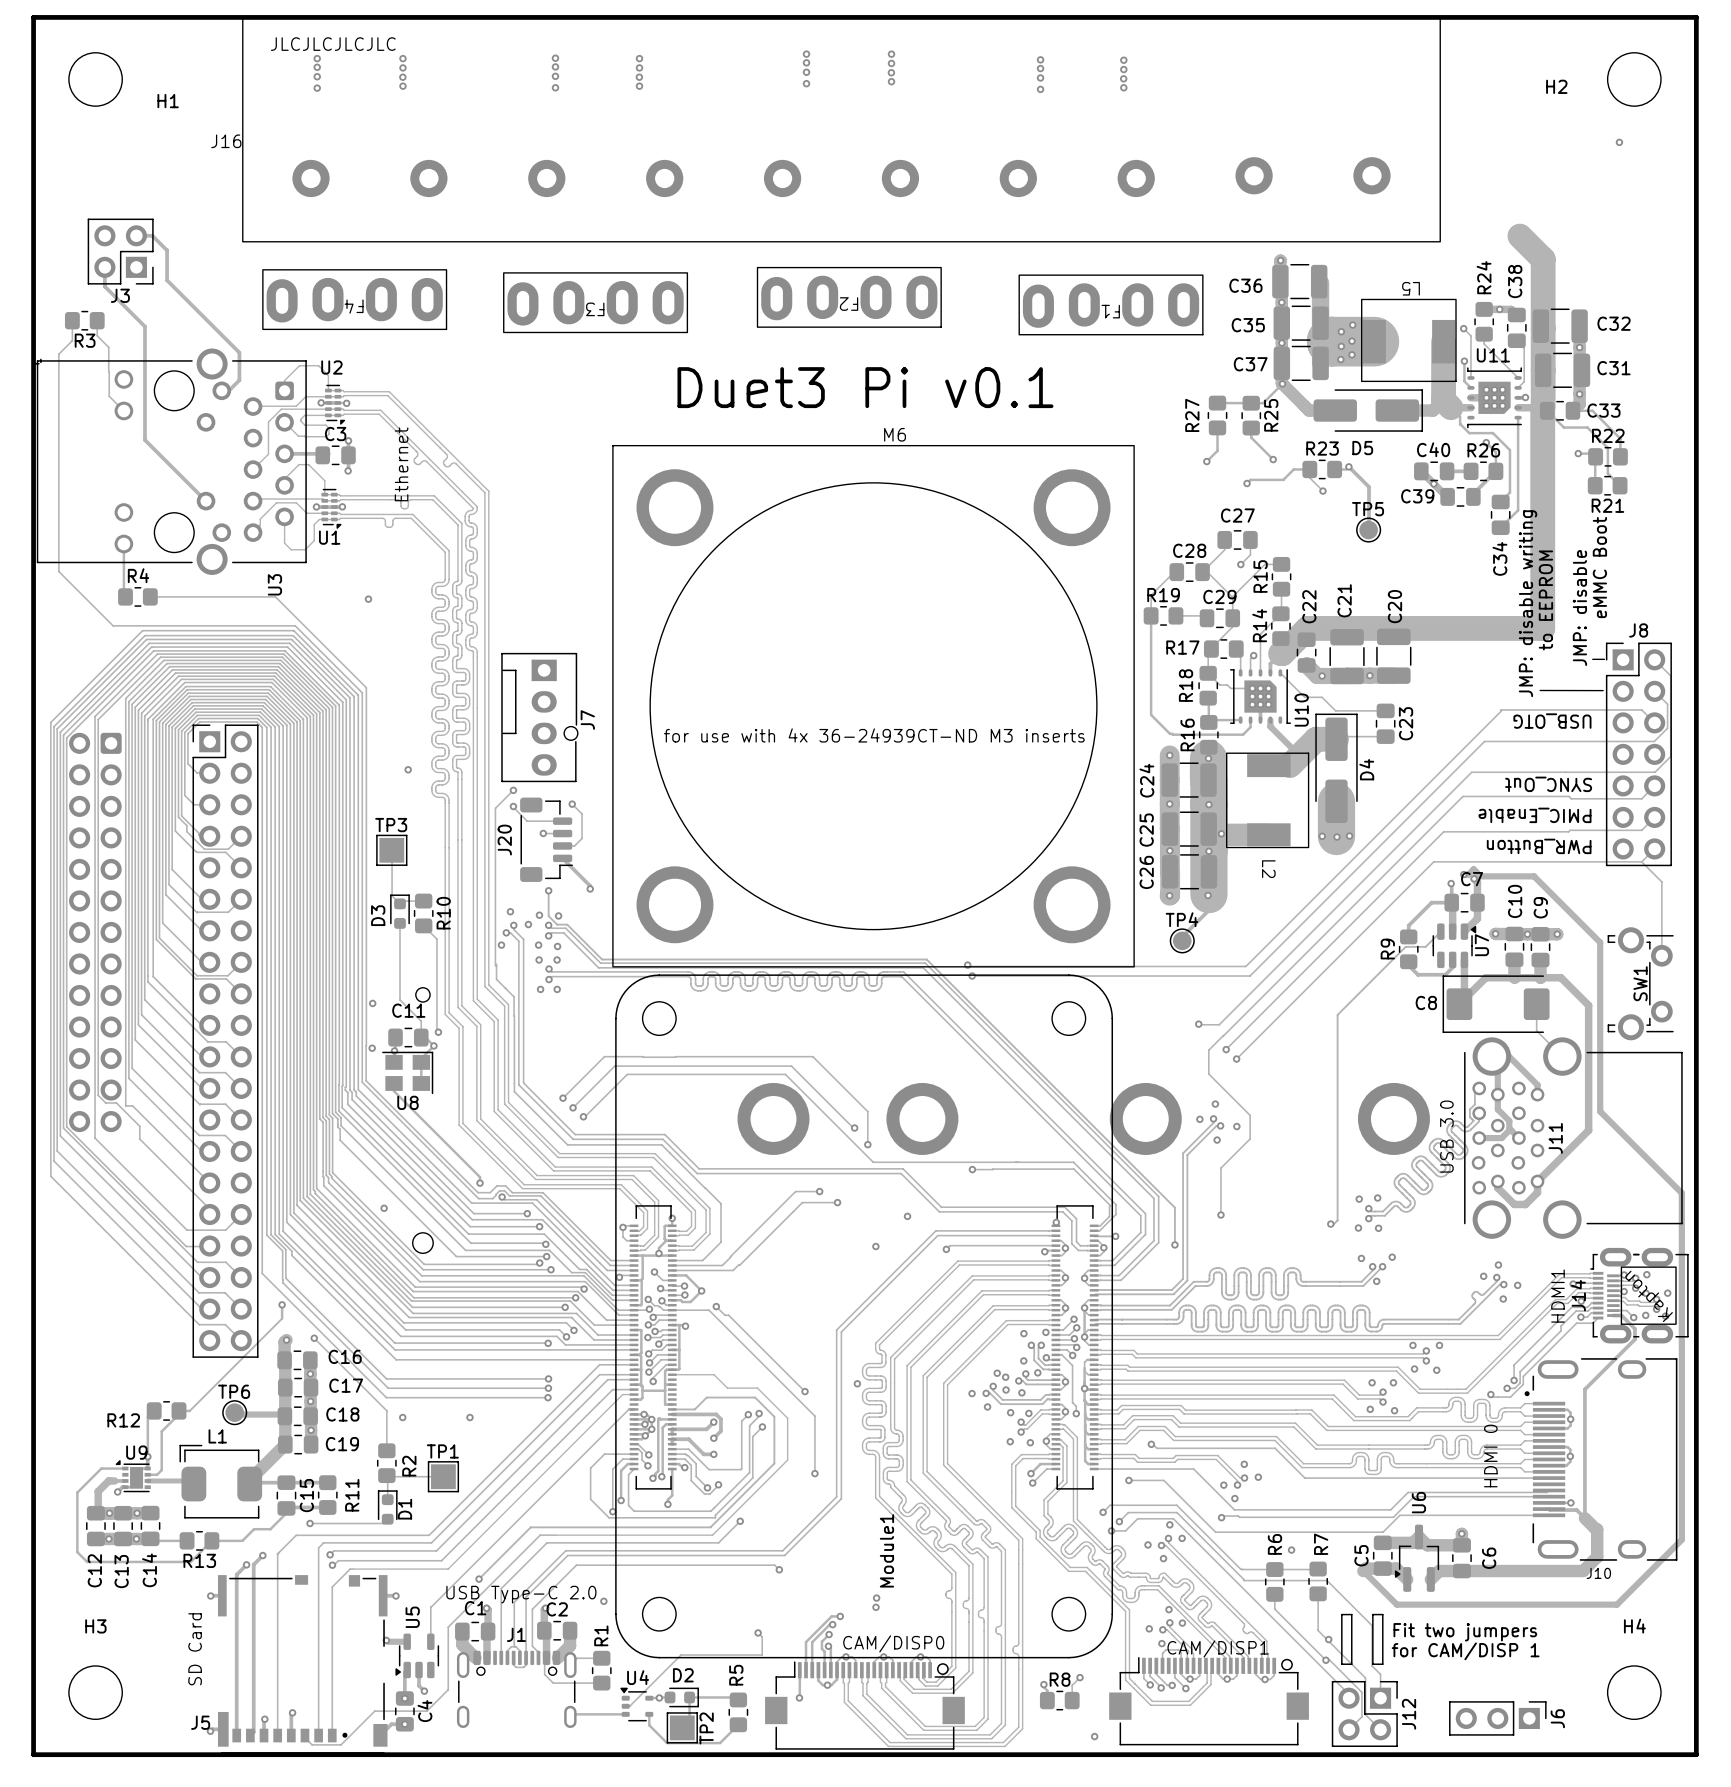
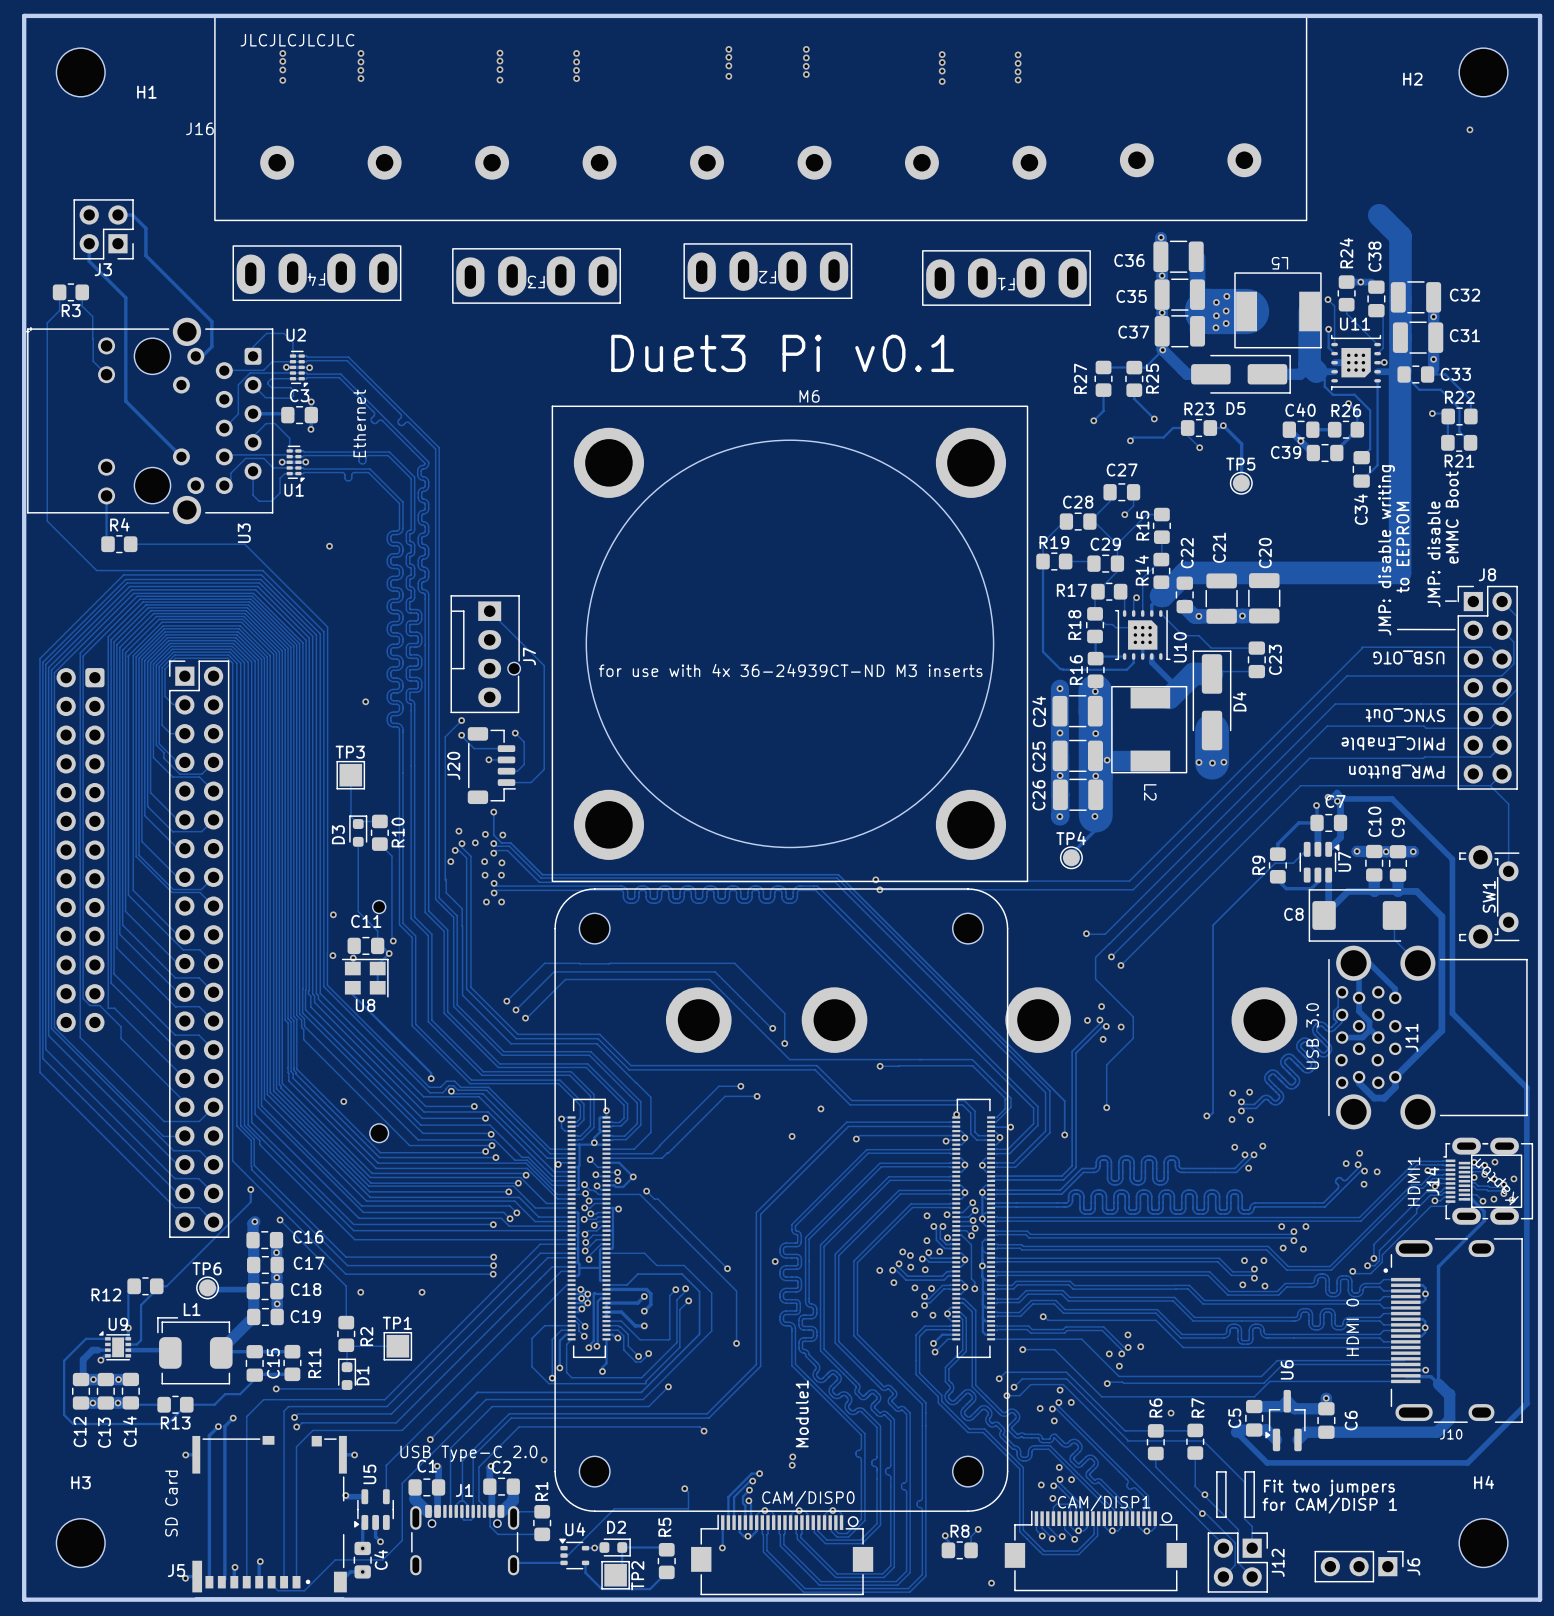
track: (562, 858) (590, 885) (590, 888) -> (506, 782) (531, 782) (544, 769) (544, 665) (489, 611)
via: (590, 888) -> none

